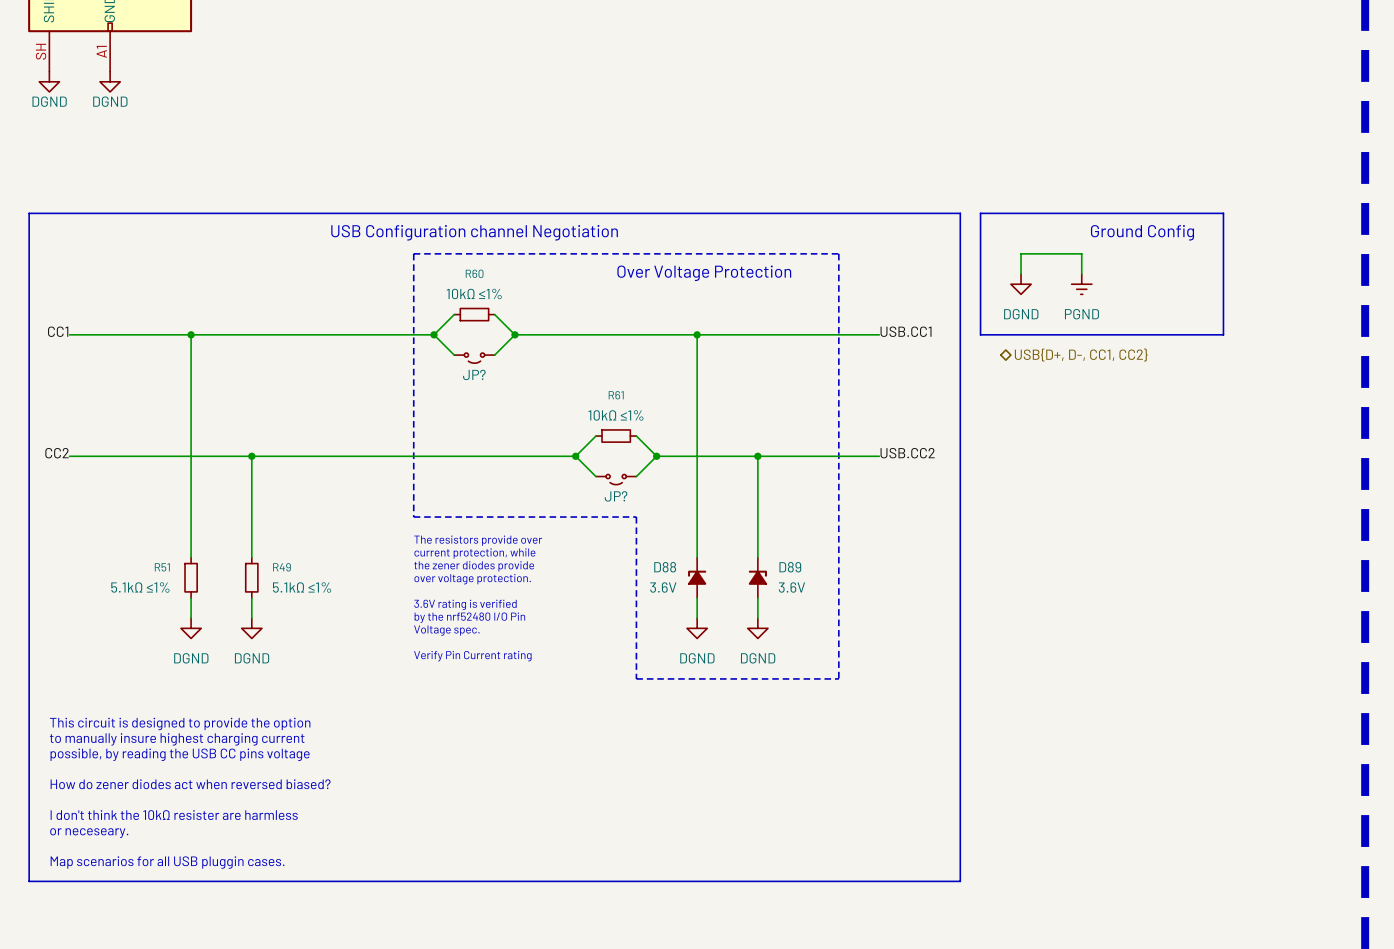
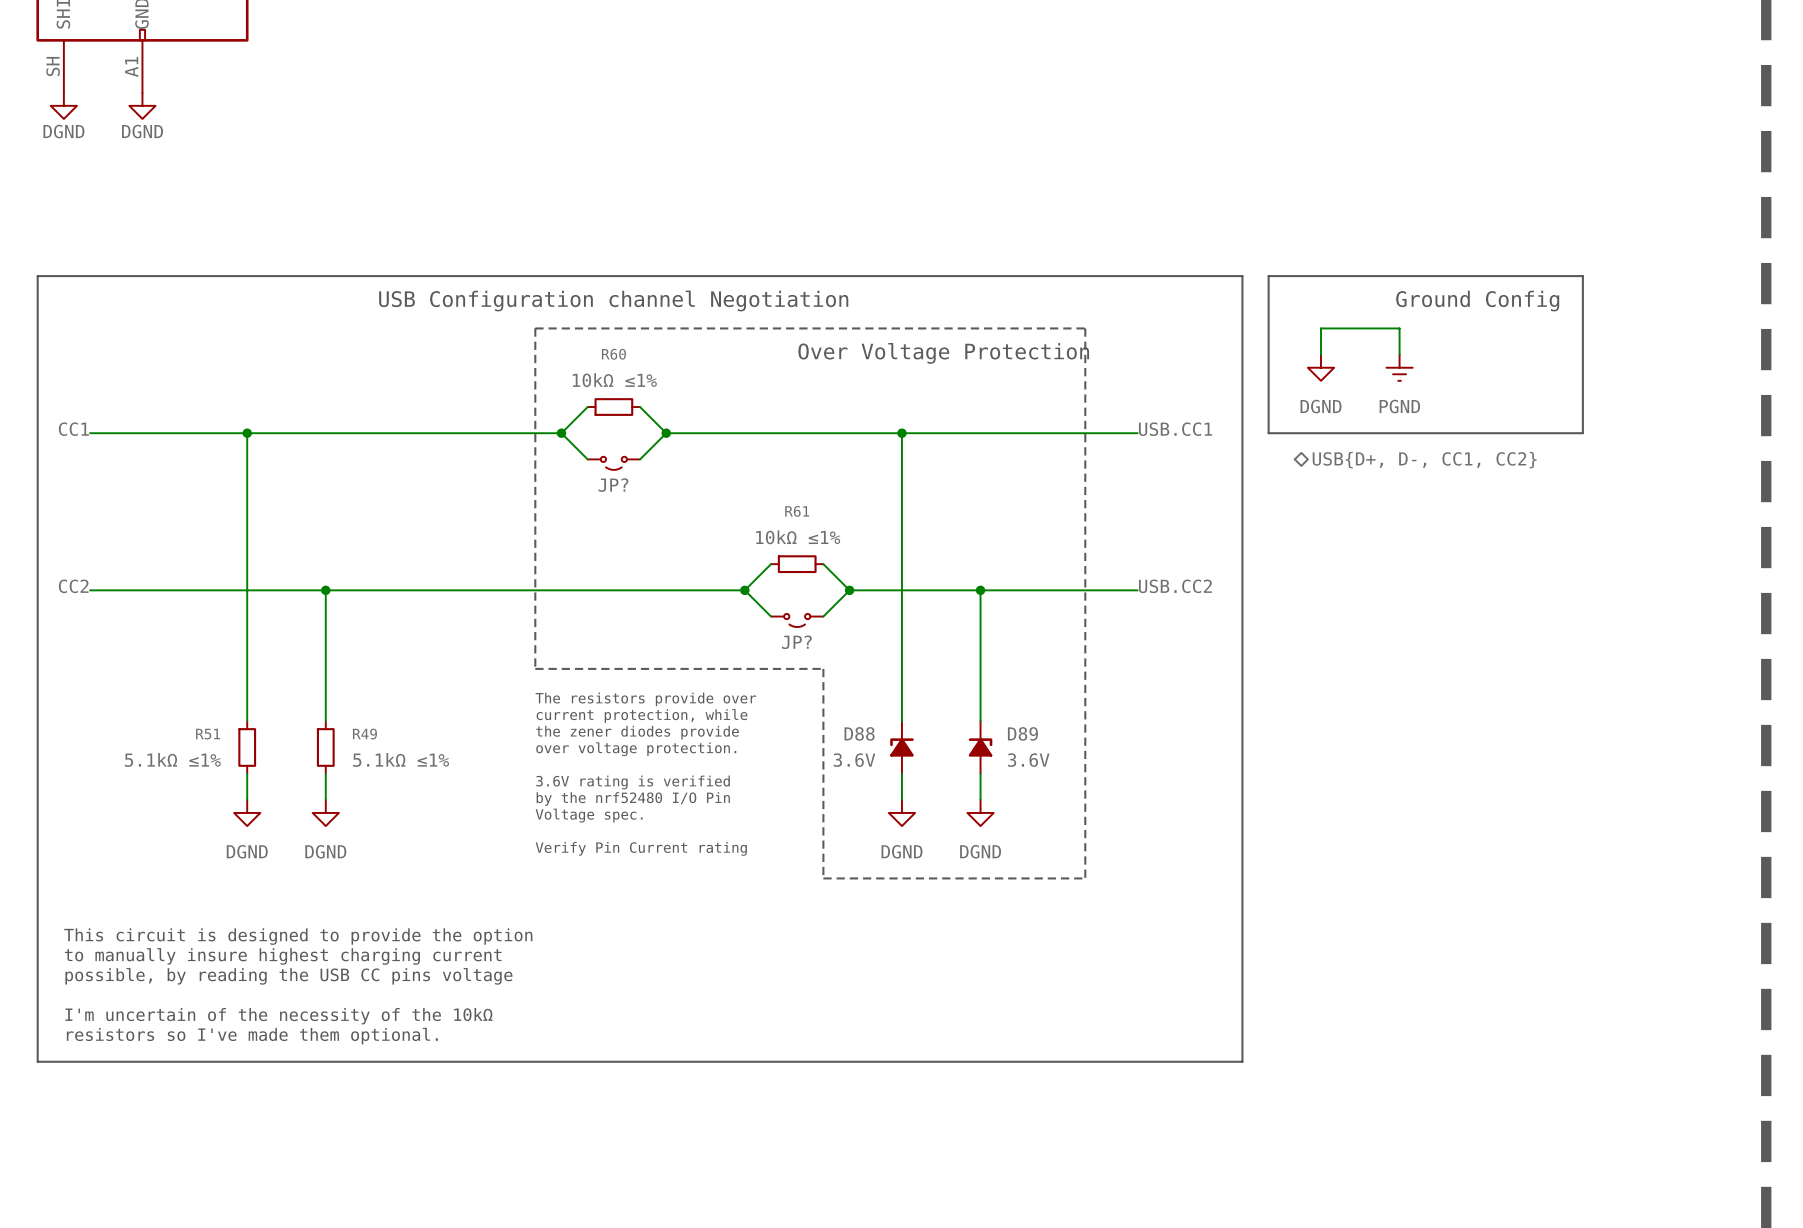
text: How do zener diodes act when reversed biased? (190, 784) -> I'm uncertain of the necessity of the 10kΩ (278, 1016)
text: none -> resistors so I've made them optional. (252, 1036)
text: I don't think the 10kΩ resister are harmless (174, 815) -> none
line: (29, 820) (29, 881) (960, 881) (960, 820) -> (37, 1061) (1242, 1061)
text: or neceseary. (89, 833) -> none
text: Map scenarios for all USB pluggin cases. (167, 862) -> none

